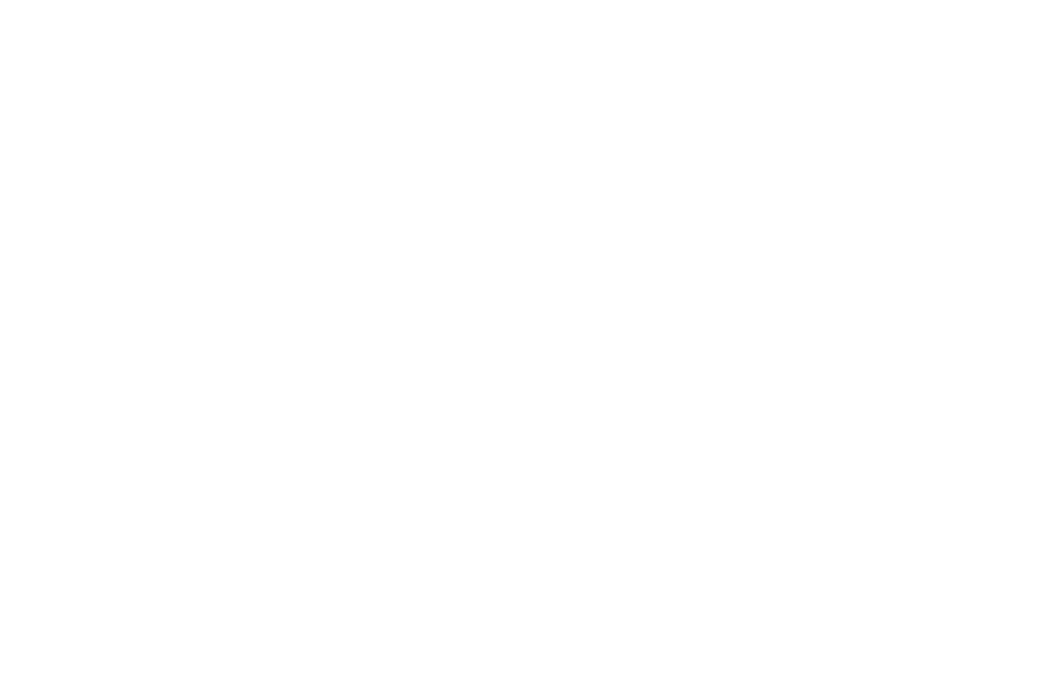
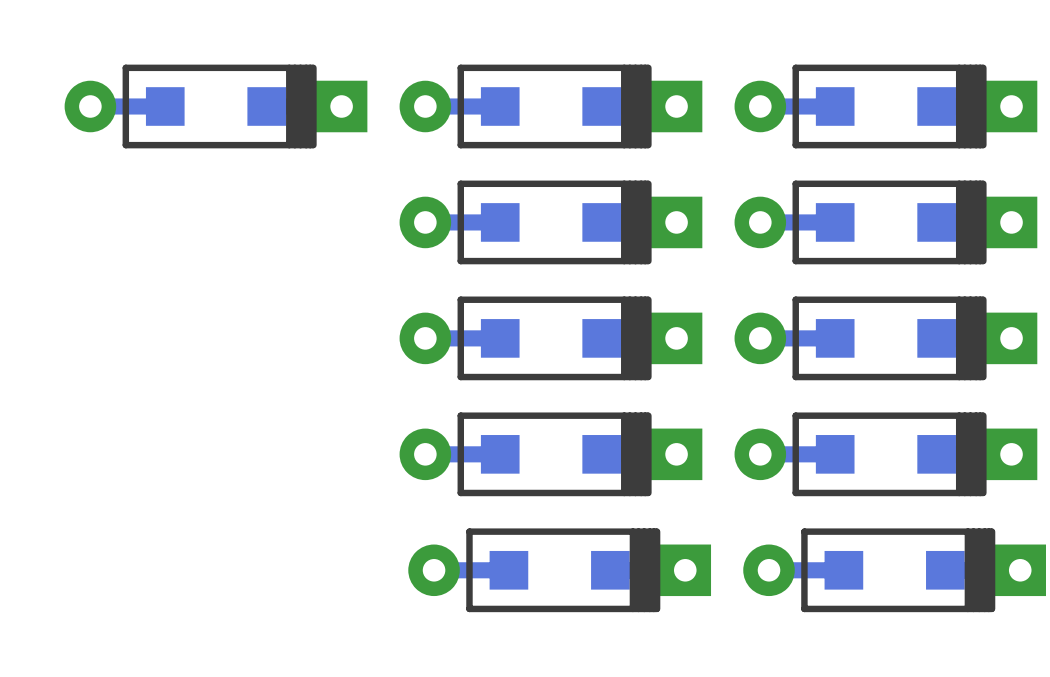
part: none -> (216, 106)
part: none -> (550, 106)
part: none -> (885, 106)
part: none -> (550, 222)
part: none -> (885, 222)
part: none -> (550, 338)
part: none -> (885, 338)
part: none -> (550, 454)
part: none -> (885, 454)
part: none -> (559, 570)
part: none -> (894, 570)

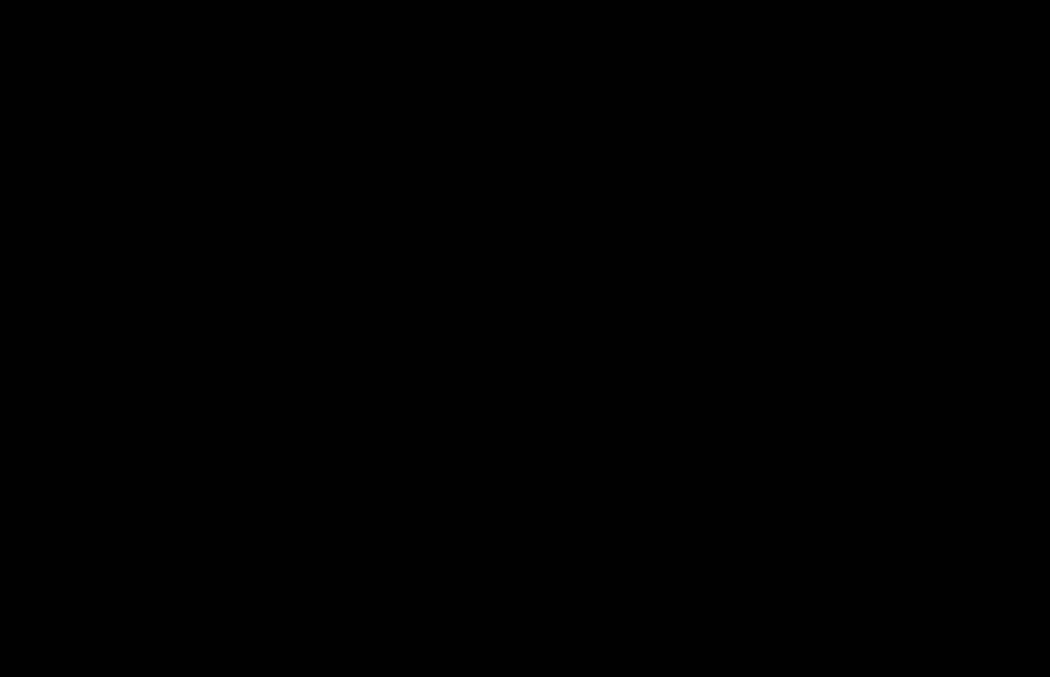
part: (216, 106) -> none
part: (550, 106) -> none
part: (885, 106) -> none
part: (550, 222) -> none
part: (885, 222) -> none
part: (550, 338) -> none
part: (885, 338) -> none
part: (550, 454) -> none
part: (885, 454) -> none
part: (559, 570) -> none
part: (894, 570) -> none

